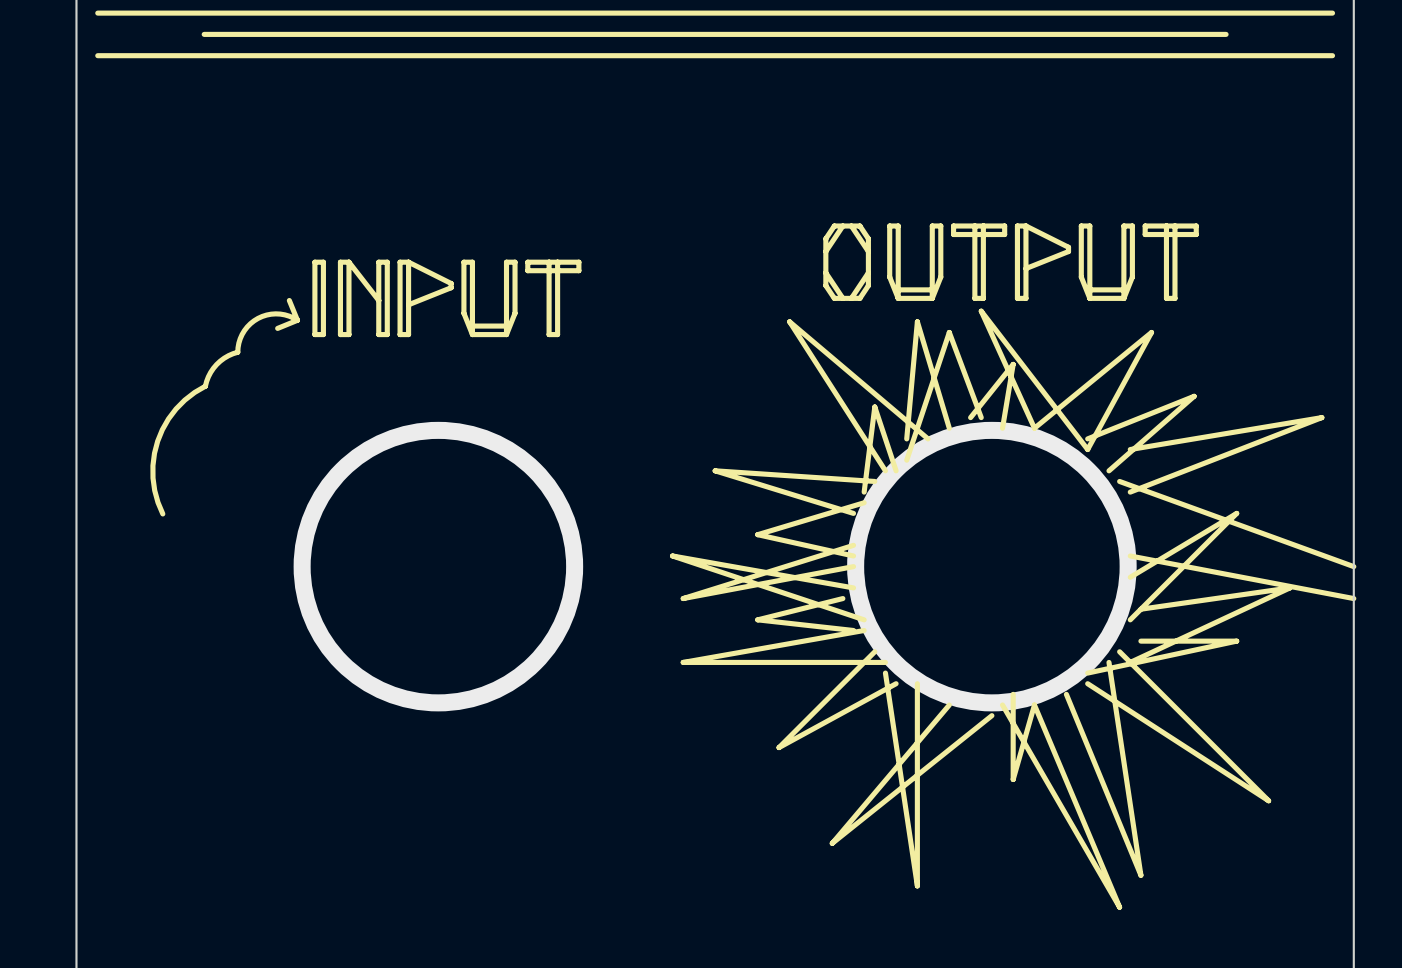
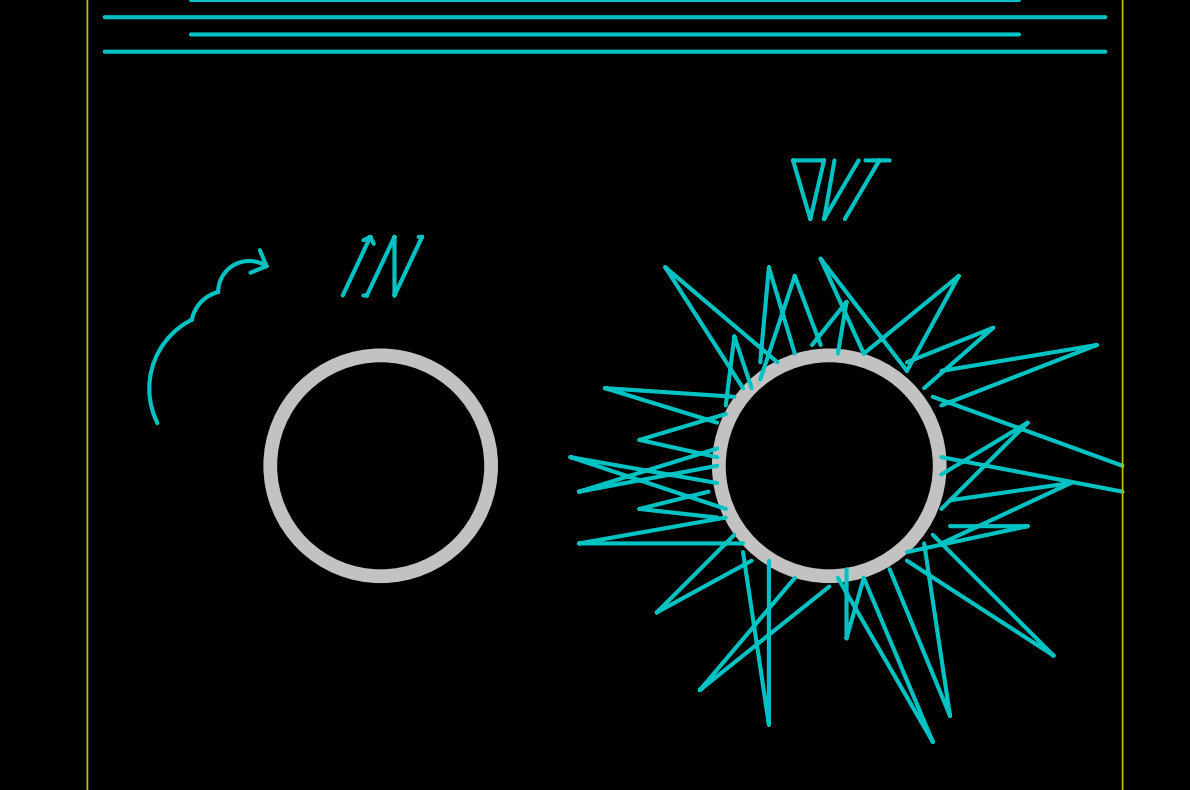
line: none -> (793, 160) (824, 160) (810, 219) (793, 160)
line: none -> (834, 160) (824, 219) (858, 160)
line: none -> (865, 160) (889, 160)
line: none -> (879, 160) (844, 219)
line: (834, 226) (825, 238) (825, 285) (834, 298) (859, 298) (868, 285) (868, 238) (859, 226) (834, 226) -> none
line: (842, 226) (825, 251) -> none
line: (851, 226) (868, 251) -> none
line: (953, 226) (1004, 226) (1004, 234) (953, 234) (953, 226) -> none
line: (974, 226) (974, 298) (983, 298) (983, 226) -> none
line: (1025, 226) (1017, 226) (1017, 298) (1025, 298) (1025, 226) -> none
line: (1025, 226) (1068, 247) (1068, 251) (1025, 268) -> none
line: (1145, 226) (1196, 226) (1196, 234) (1145, 234) (1145, 226) -> none
line: (1166, 226) (1166, 298) (1174, 298) (1174, 226) -> none
line: (314, 262) (323, 262) (323, 334) (314, 334) (314, 262) -> none
line: (348, 262) (340, 262) (340, 334) (348, 334) (348, 262) -> none
line: (348, 262) (378, 300) -> none
line: (378, 262) (387, 262) (387, 334) (378, 334) (378, 262) -> none
line: (408, 262) (400, 262) (400, 334) (408, 334) (408, 262) -> none
line: (408, 262) (451, 283) (451, 287) (408, 304) -> none
line: (527, 262) (578, 262) (578, 270) (527, 270) (527, 262) -> none
line: (549, 262) (549, 334) (557, 334) (557, 262) -> none
line: (825, 272) (842, 298) -> none
line: (868, 272) (851, 298) -> none
line: none -> (370, 236) (342, 295)
line: none -> (370, 236) (363, 240)
line: none -> (370, 236) (373, 243)
line: none -> (418, 236) (422, 236) (394, 295) (394, 236) (366, 295) (363, 295)
line: (898, 289) (932, 289) -> none
line: (1089, 289) (1123, 289) -> none
line: (898, 298) (932, 298) -> none
line: (898, 298) (898, 226) (889, 226) (889, 277) (898, 298) -> none
line: (932, 298) (940, 277) (940, 226) (932, 226) (932, 298) -> none
line: (1089, 298) (1123, 298) -> none
line: (1089, 298) (1089, 226) (1081, 226) (1081, 277) (1089, 298) -> none
line: (1123, 298) (1132, 277) (1132, 226) (1123, 226) (1123, 298) -> none
line: (472, 326) (506, 326) -> none
line: (472, 334) (506, 334) -> none
line: (472, 334) (472, 262) (463, 262) (463, 313) (472, 334) -> none
line: (506, 334) (515, 313) (515, 262) (506, 262) (506, 334) -> none

